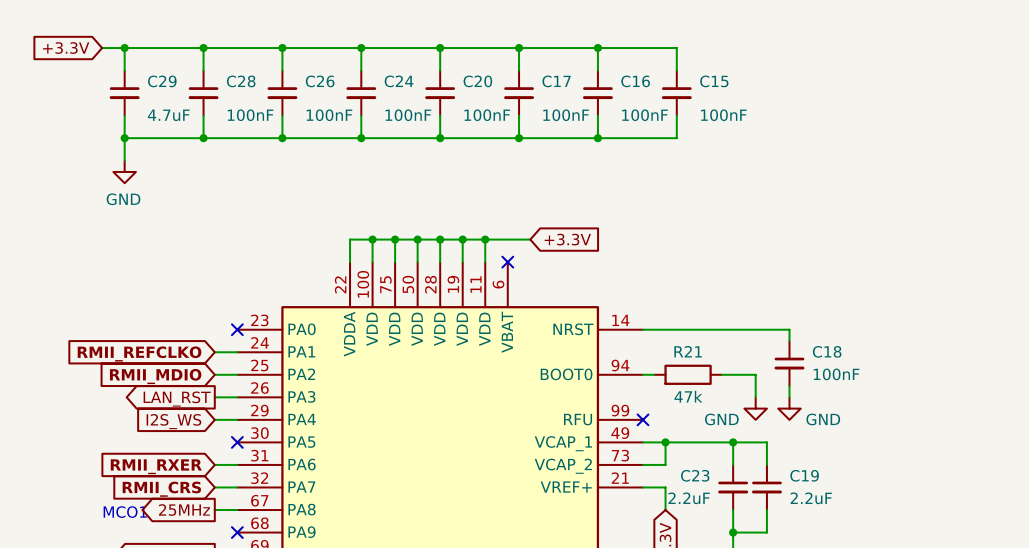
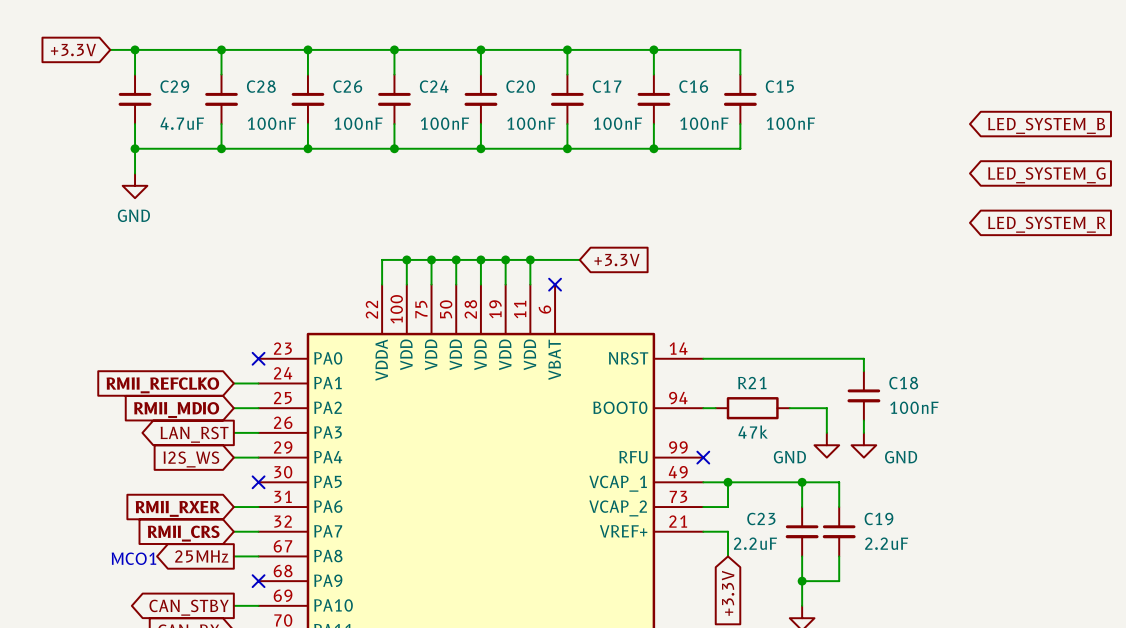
global label: none -> LED_SYSTEM_B (1046, 125)
global label: none -> LED_SYSTEM_G (1046, 175)
global label: none -> LED_SYSTEM_R (1046, 224)

